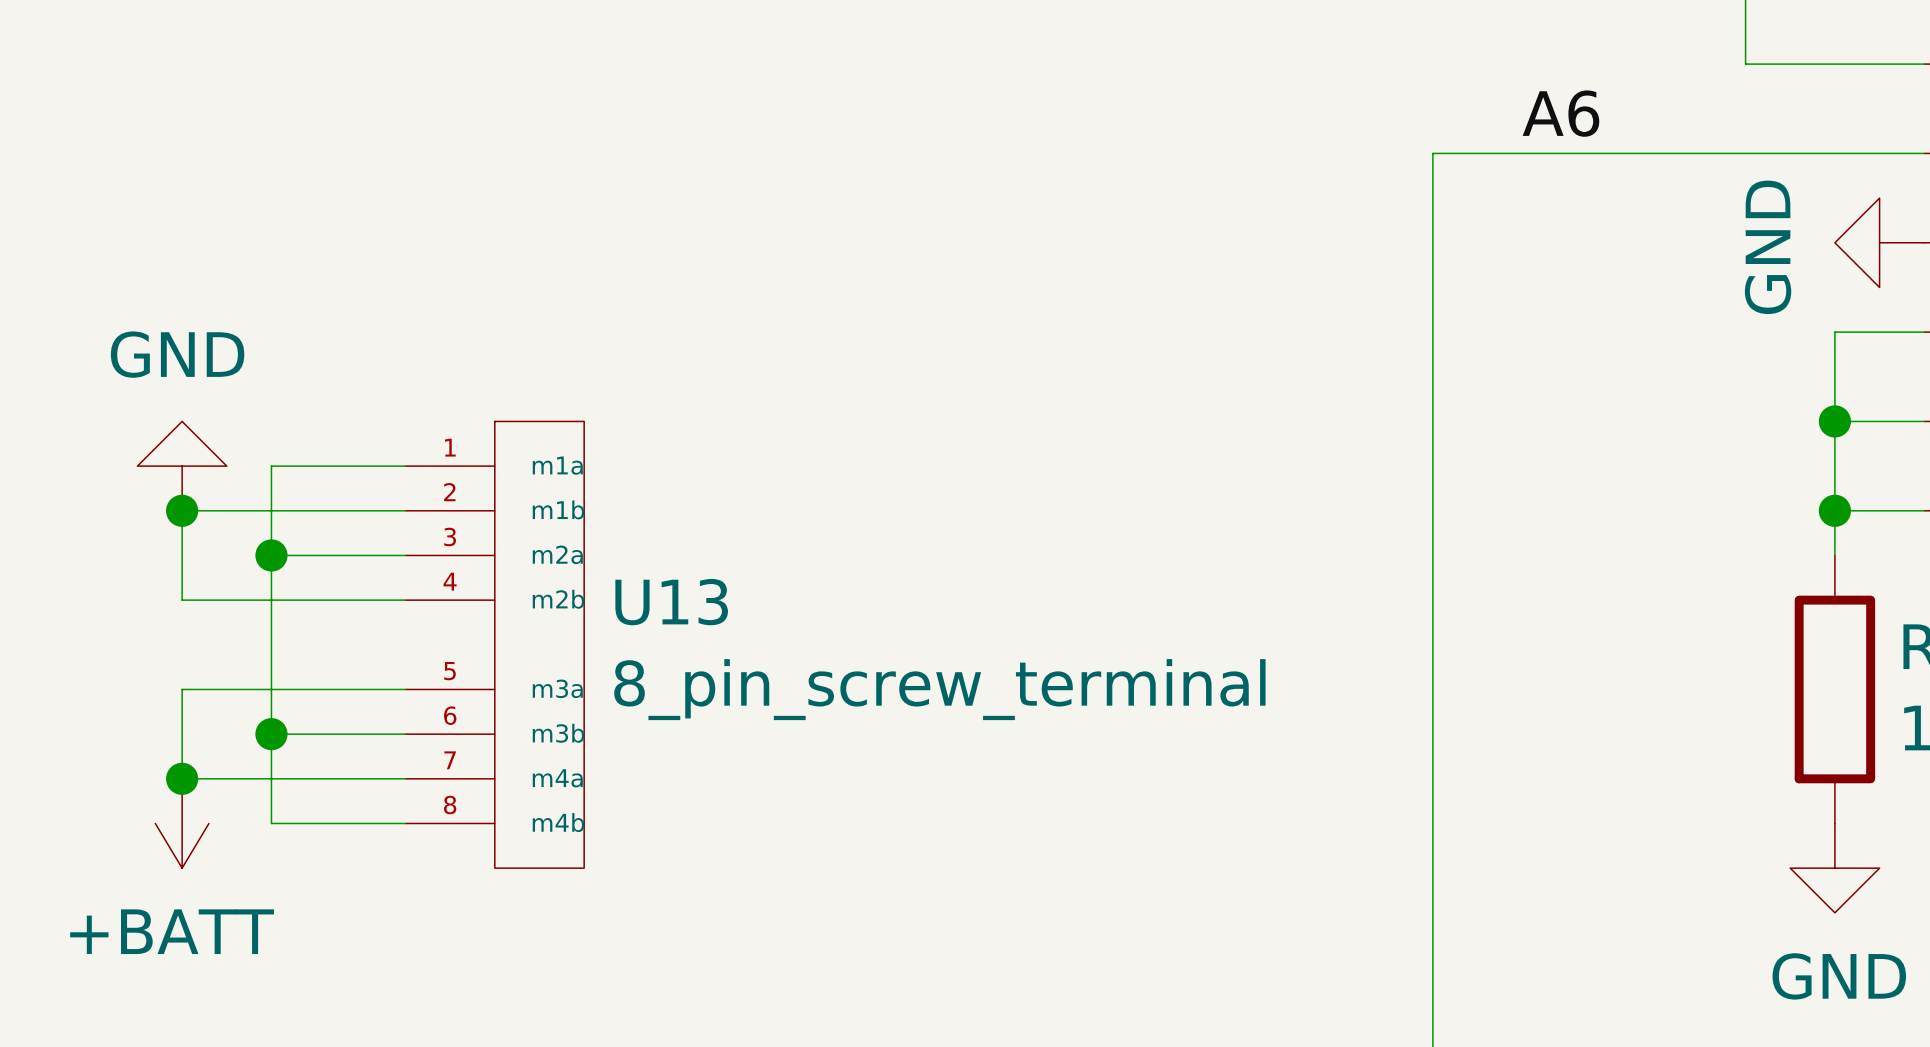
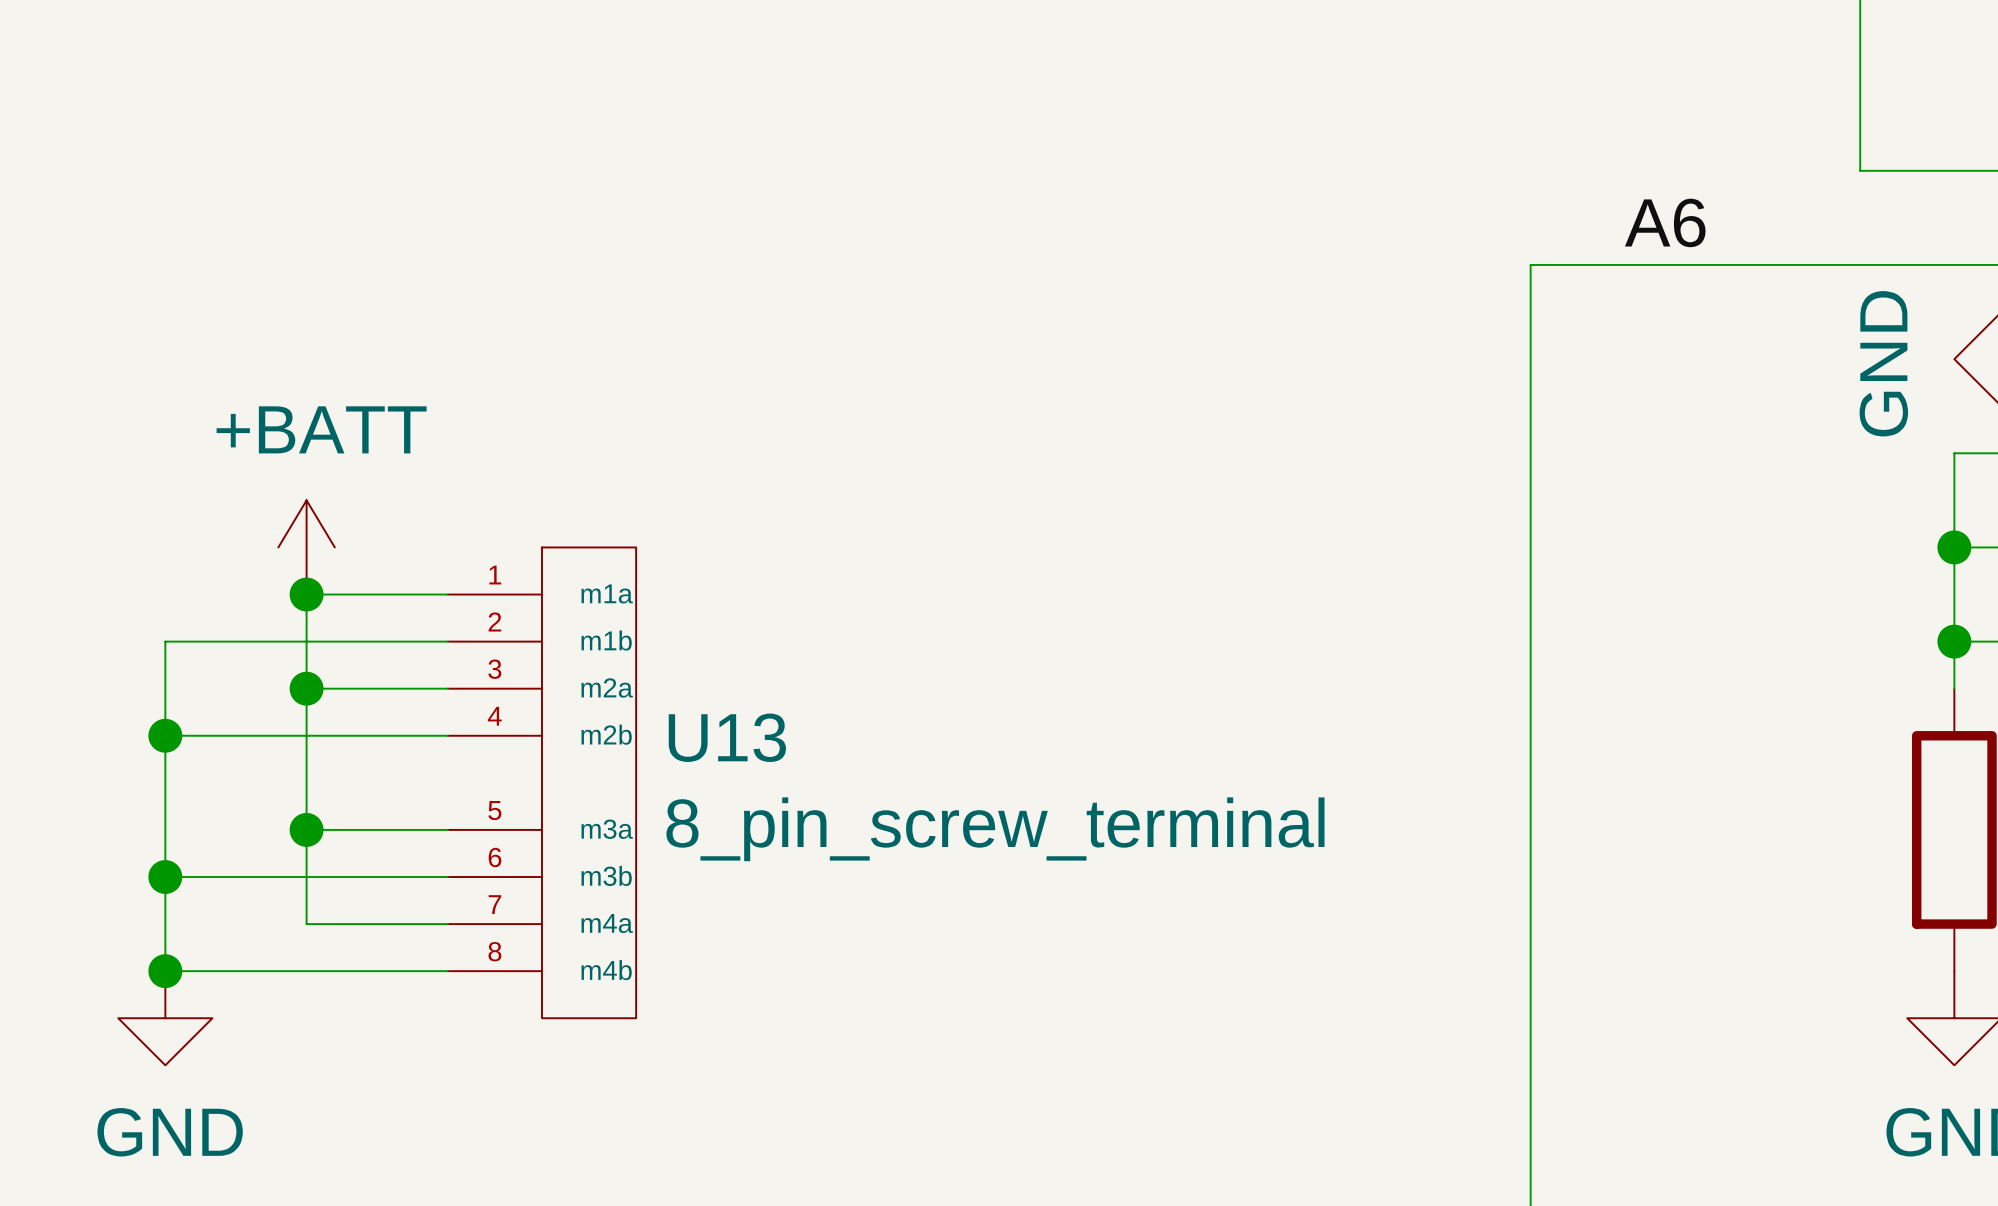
power symbol rotation: 0° (182, 466) -> 180° (165, 1018)
power symbol position: GND (182, 466) -> GND (165, 1018)
junction: none -> (306, 594)
wire: (182, 510) (182, 600) -> (165, 735) (212, 735)
junction: (182, 510) -> none
junction: none -> (165, 735)
wire: (271, 689) (182, 689) (182, 778) (271, 778) (271, 823) -> (212, 641) (165, 641) (165, 971) (306, 971)
wire: none -> (165, 877) (306, 877)
junction: none -> (165, 877)
junction position: (271, 734) -> (306, 829)
junction: (182, 778) -> none
junction: none -> (165, 971)
power symbol rotation: 0° (182, 823) -> 180° (306, 547)
power symbol position: +BATT (182, 823) -> +BATT (306, 547)

